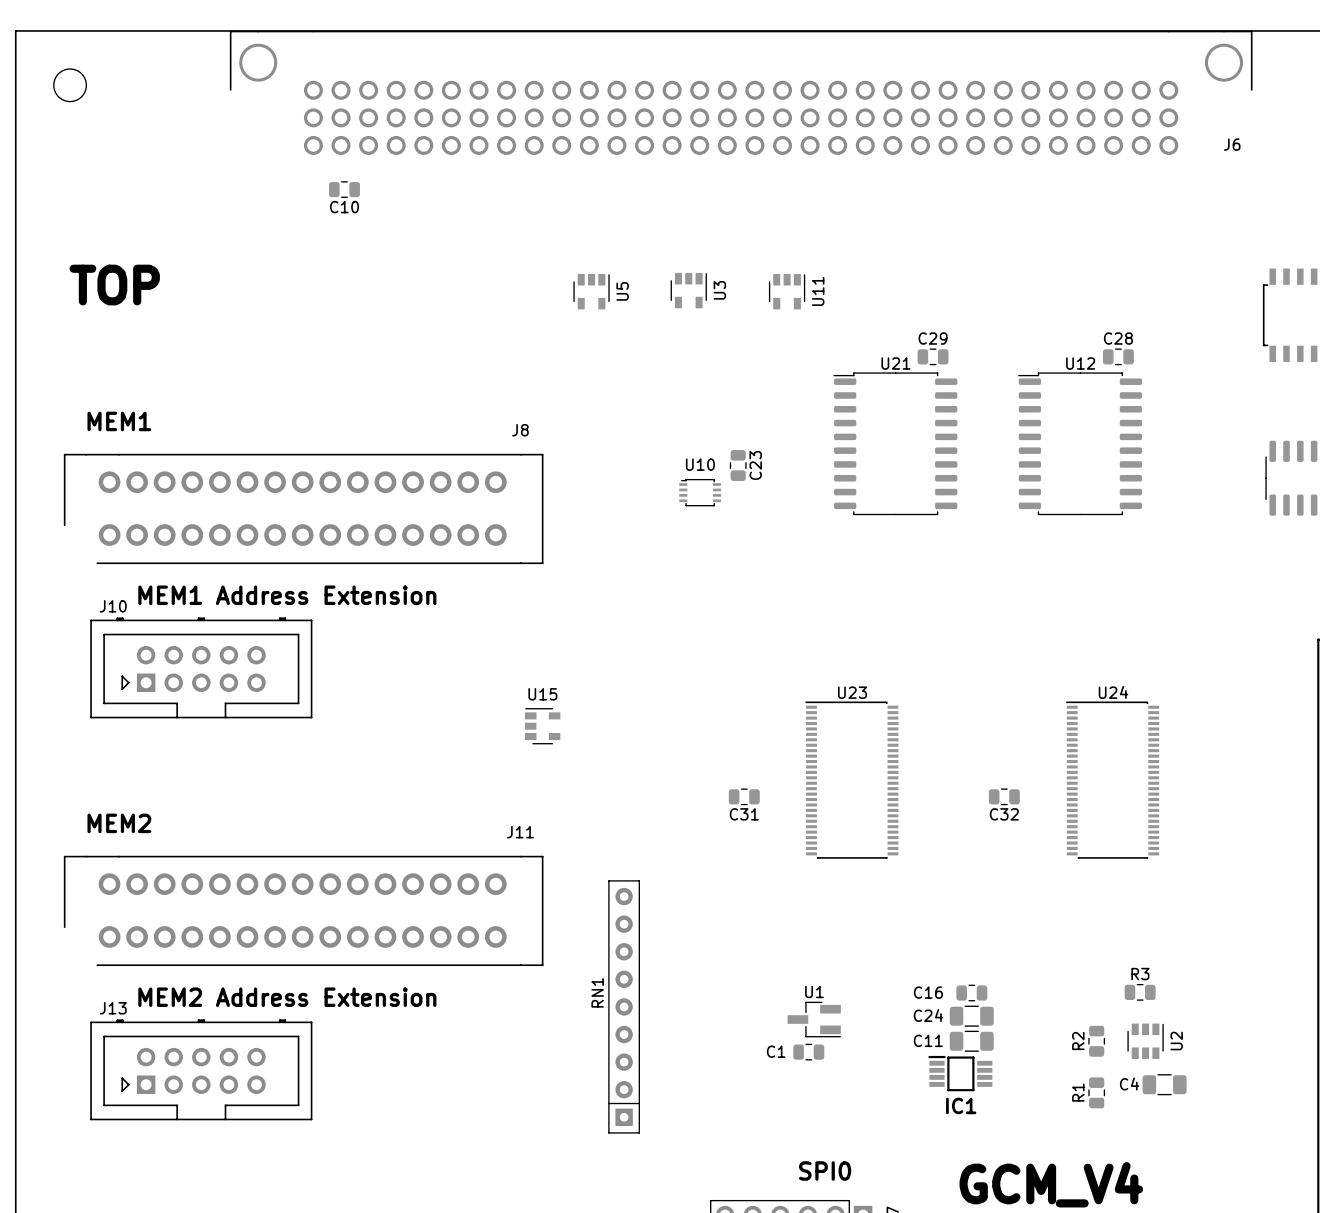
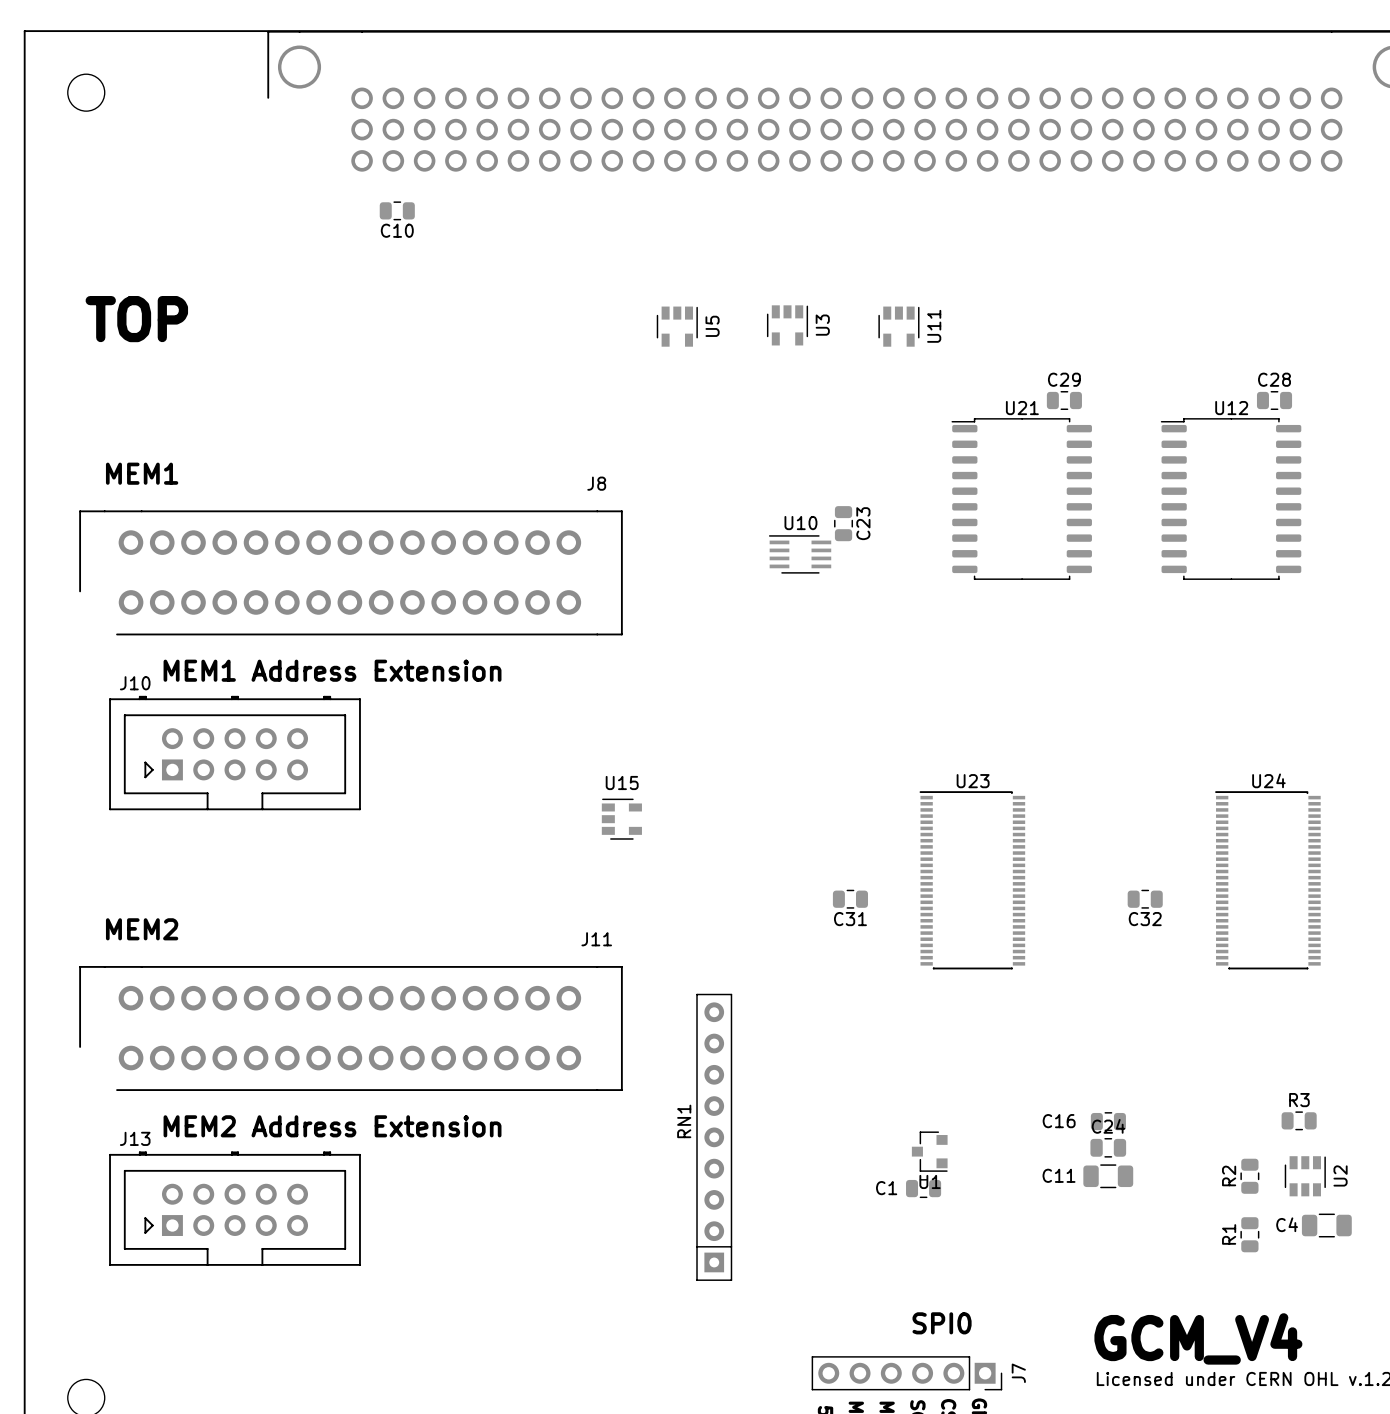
U10 footprint: [679, 478, 722, 507] -> [768, 535, 832, 574]
U1 name position: U1 (814, 991) -> U1 (930, 1181)
U1 footprint: [787, 1001, 841, 1038] -> [911, 1131, 948, 1172]
C24 footprint: [949, 1005, 994, 1027] -> [1090, 1138, 1127, 1158]
C24 name position: C24 (928, 1015) -> C24 (1108, 1126)
IC1: (960, 1073) -> none

